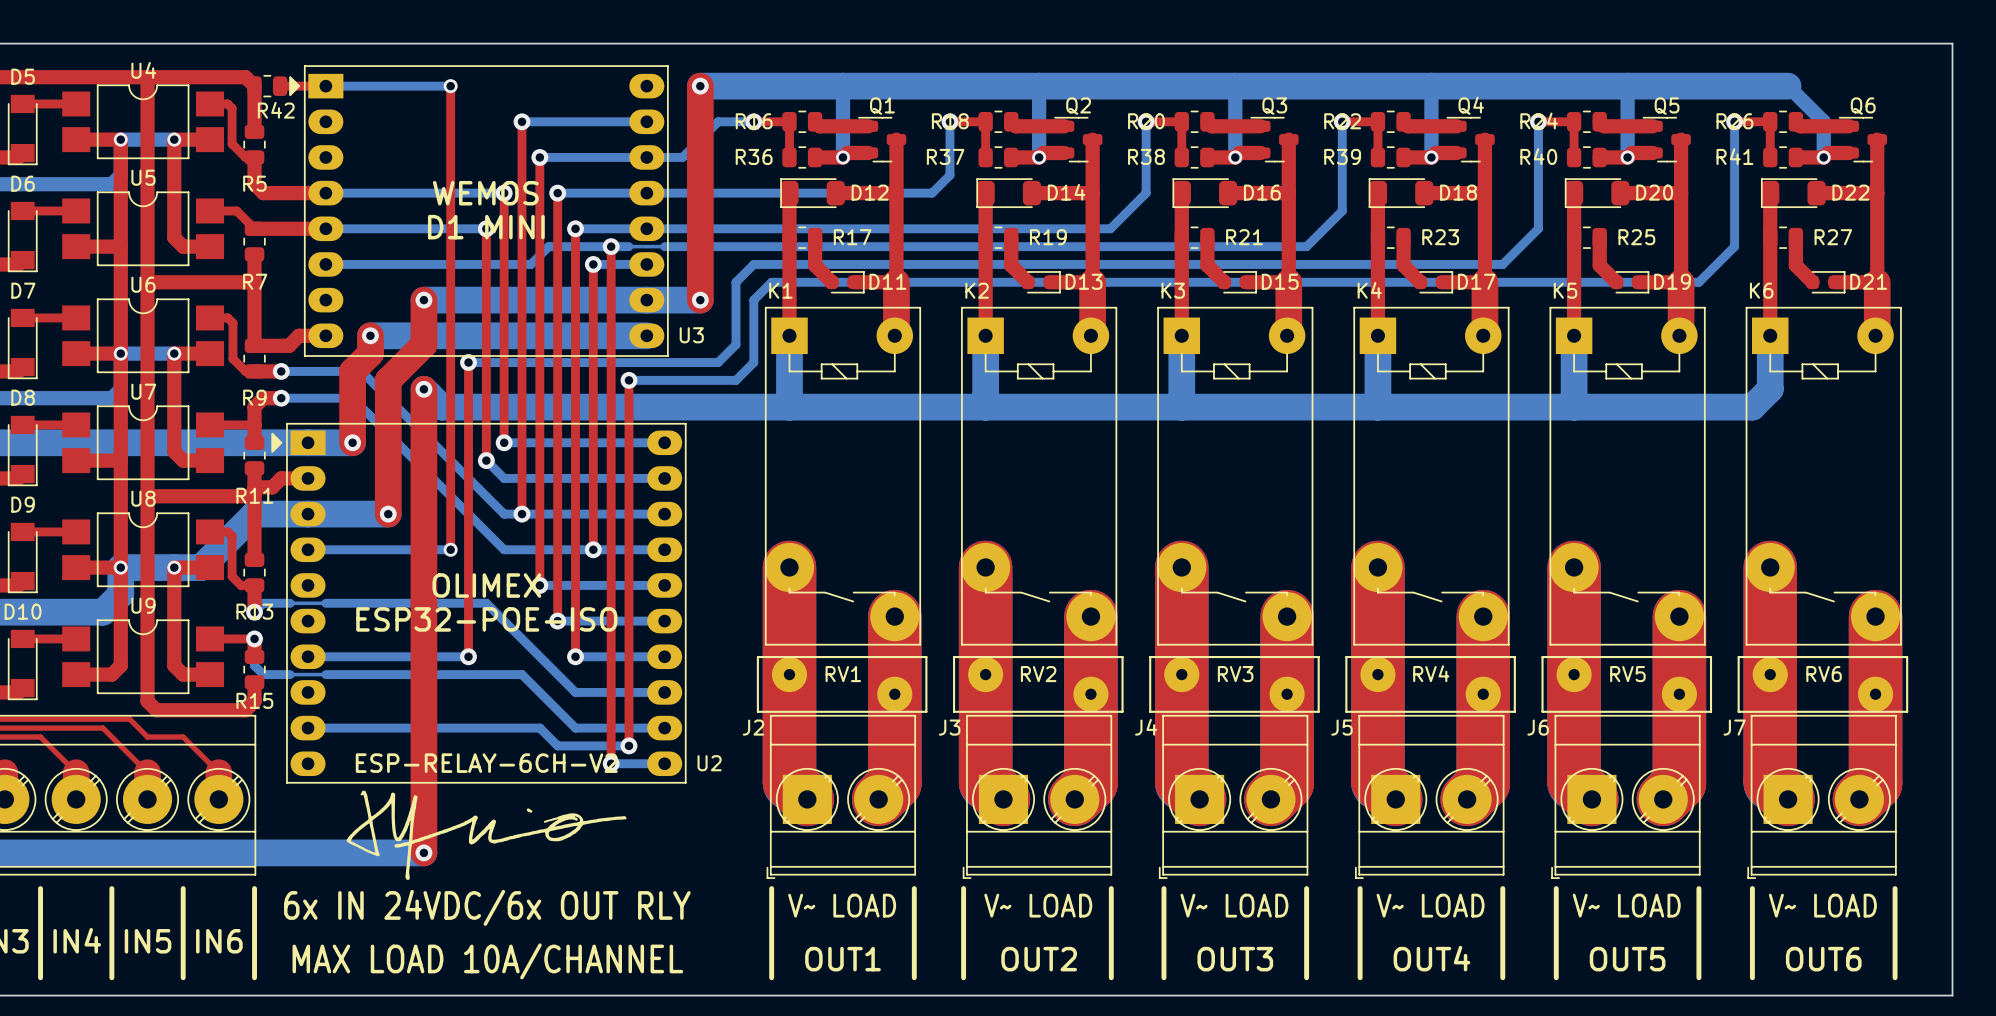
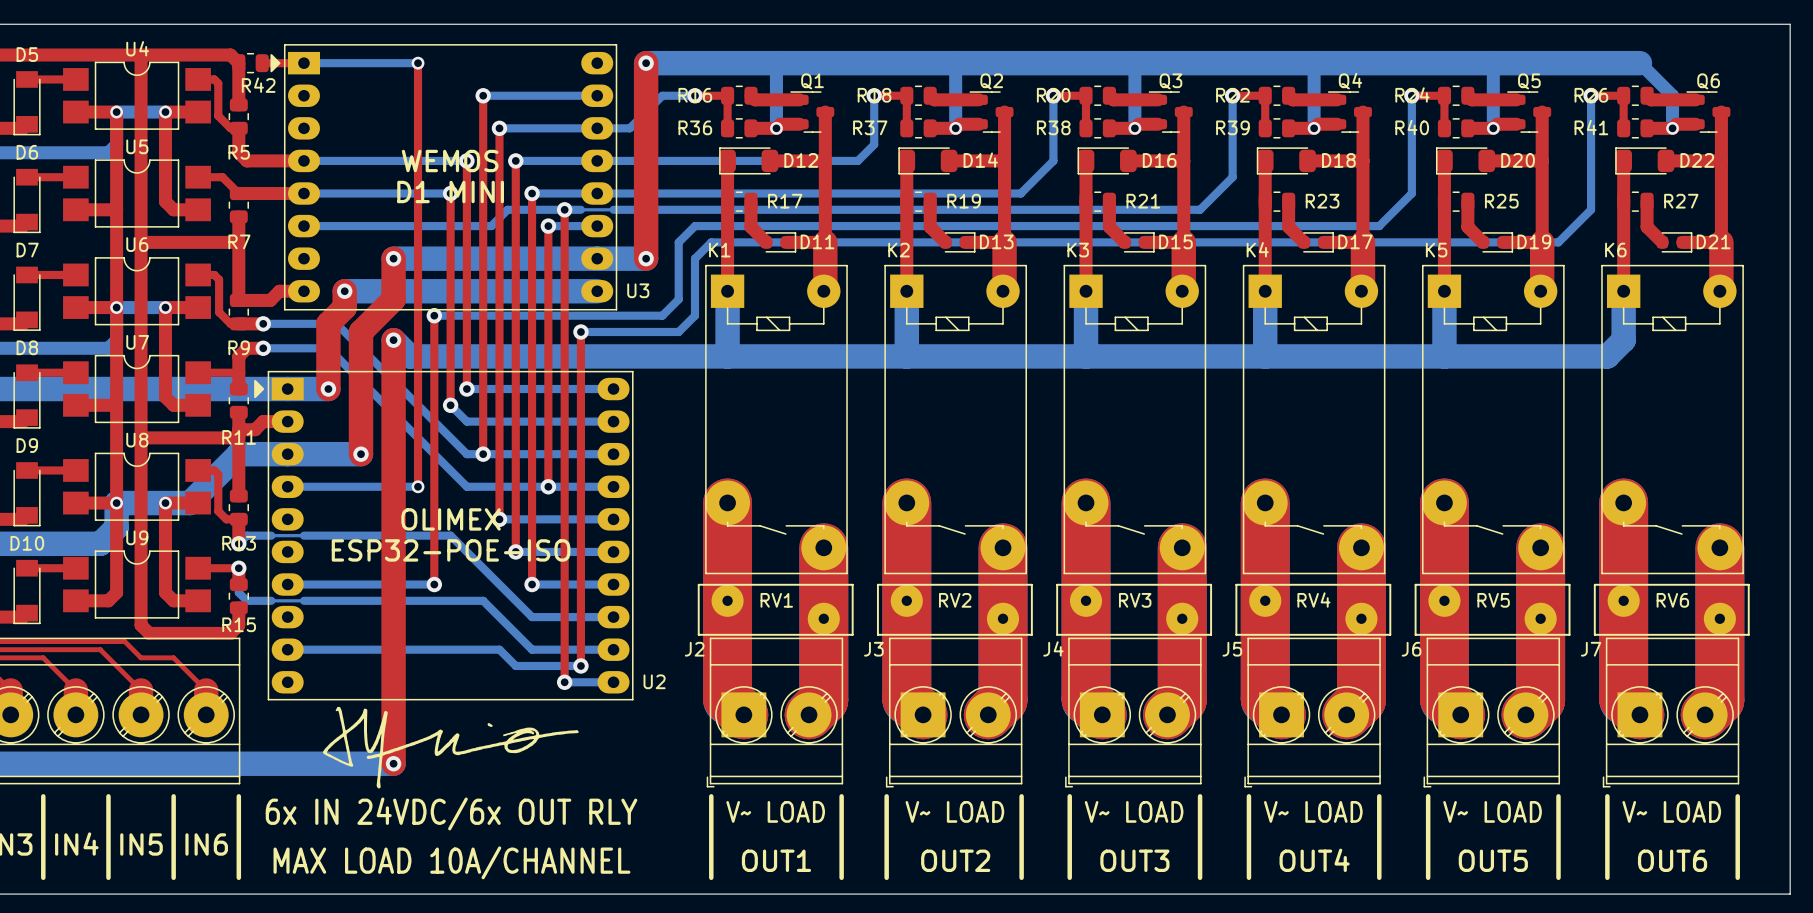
text: ESP-RELAY-6CH-V2 (486, 763) -> none

